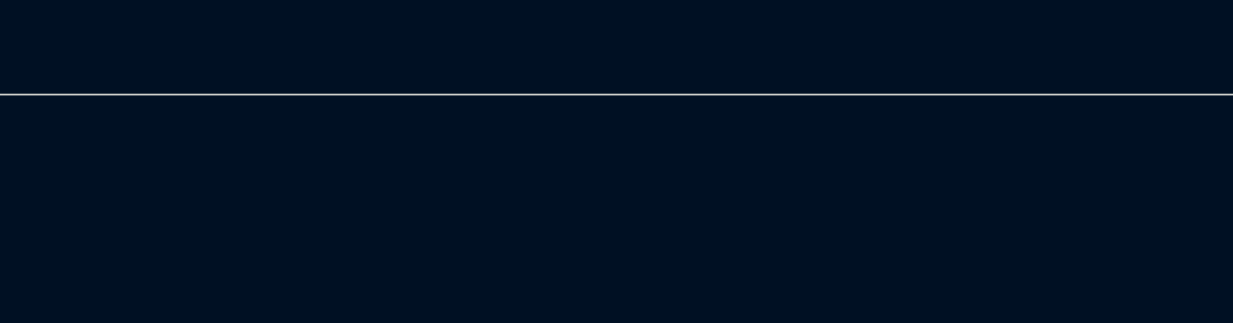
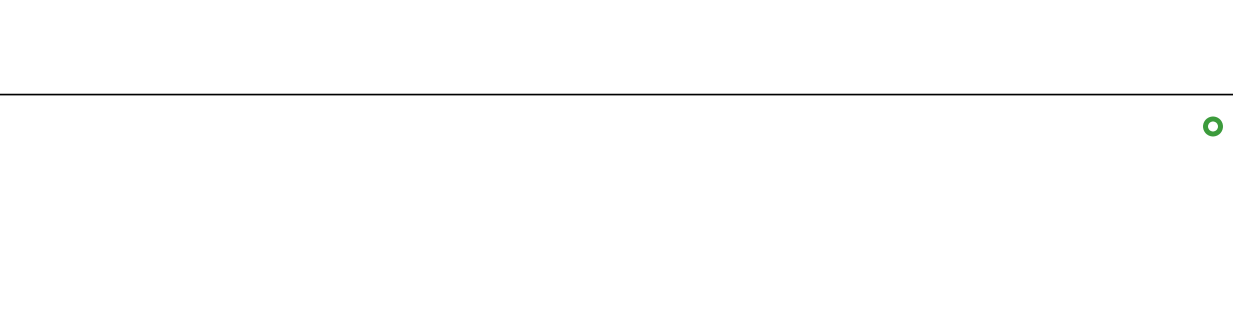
via: none -> (1213, 126)

